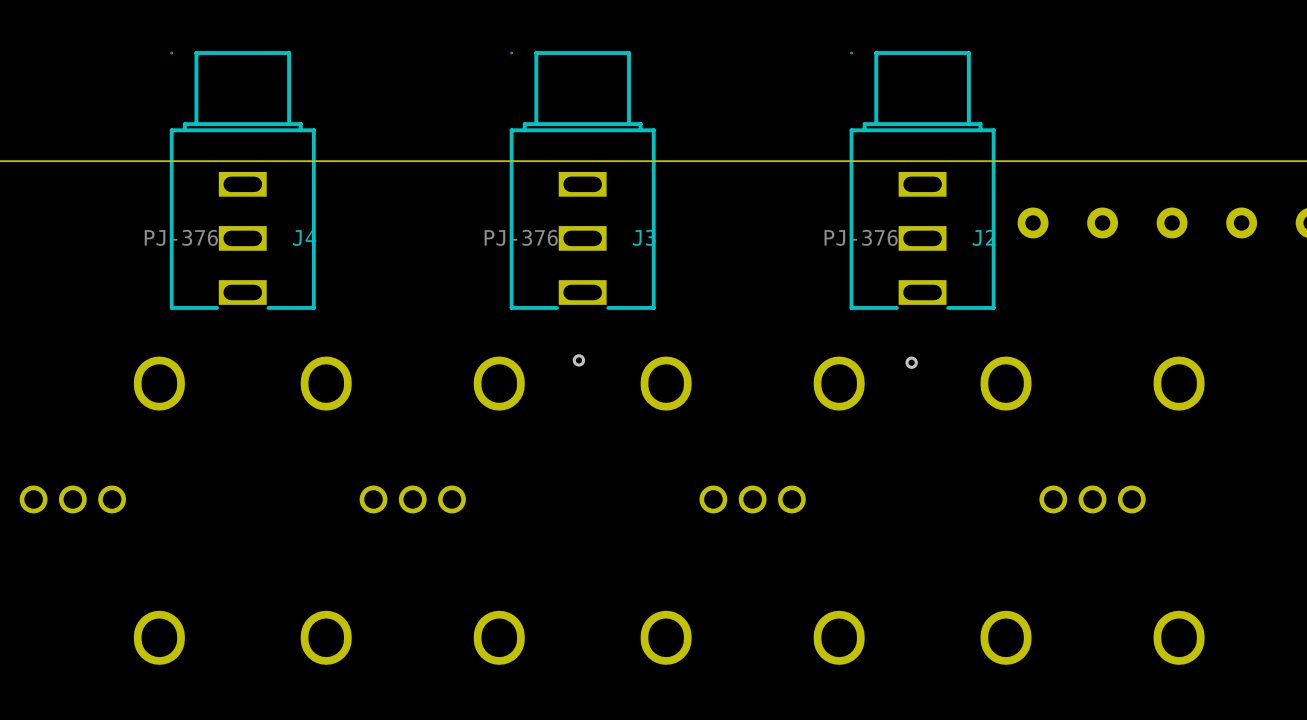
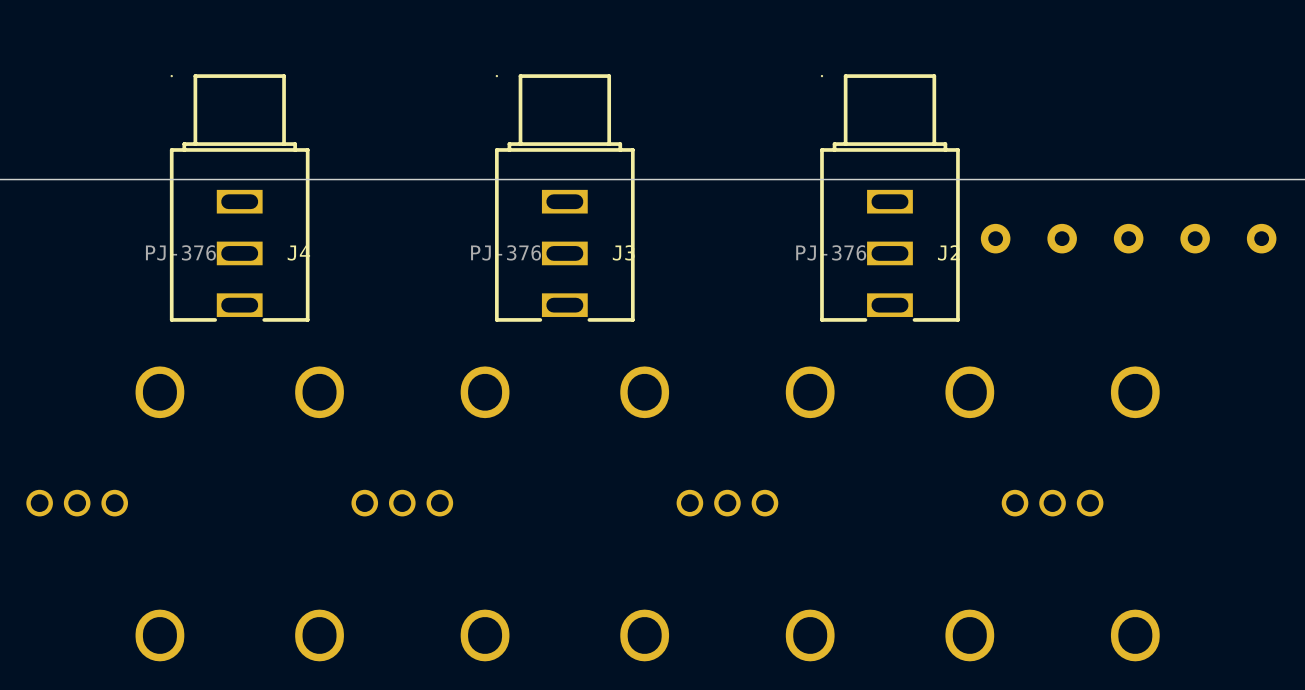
via: (578, 360) -> none
via: (911, 362) -> none

